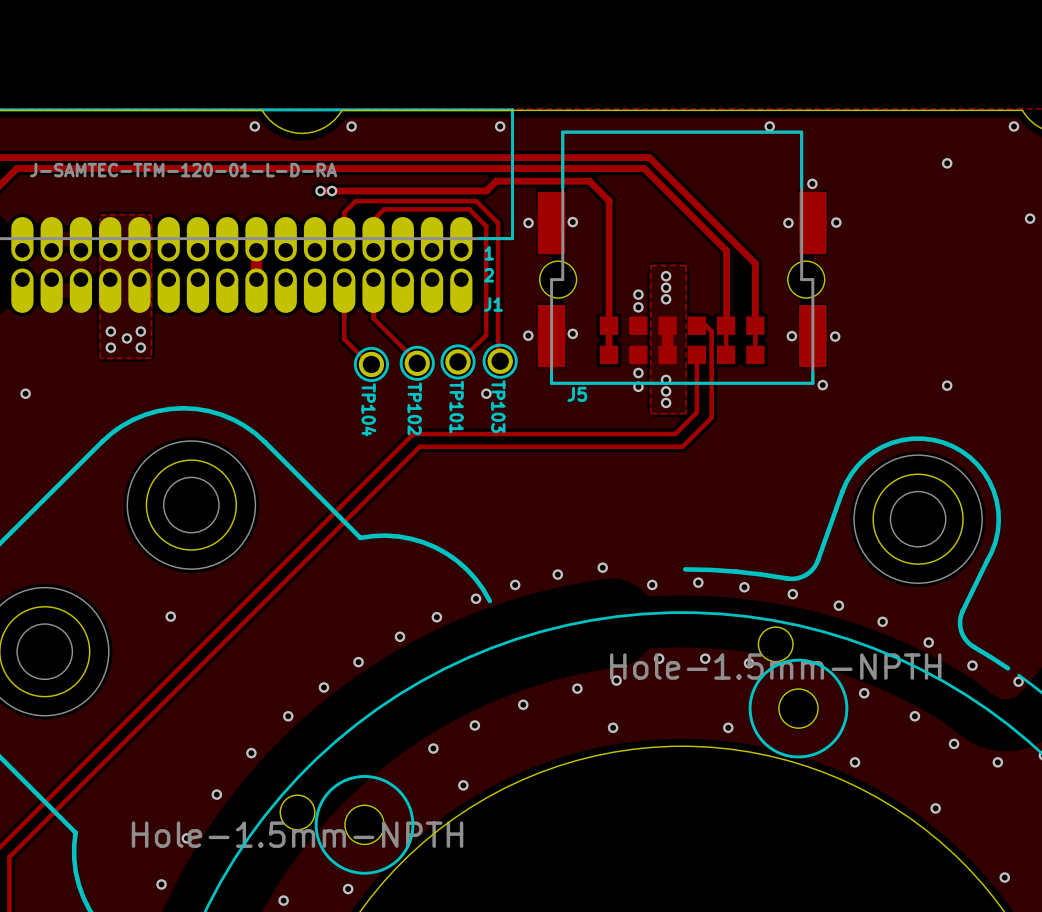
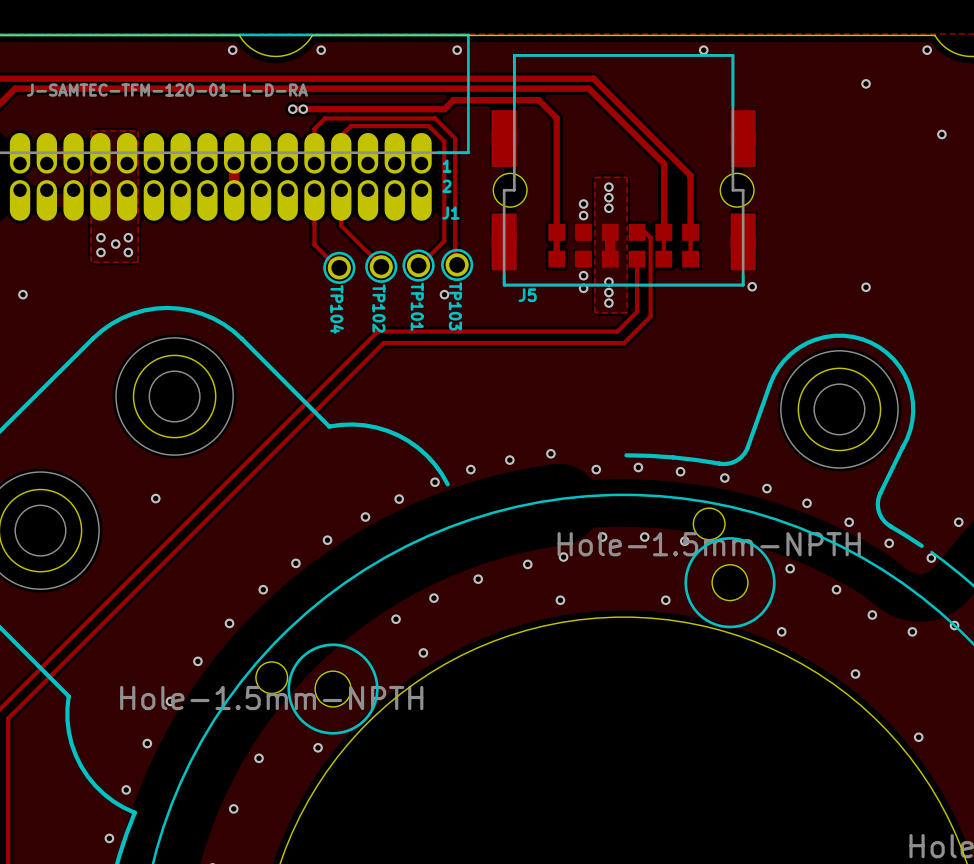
via: (812, 183) -> none
via: (572, 222) -> none
via: (836, 222) -> none
via: (528, 223) -> none
via: (788, 223) -> none
via: (572, 333) -> none
via: (528, 335) -> none
via: (791, 336) -> none
via: (835, 336) -> none

